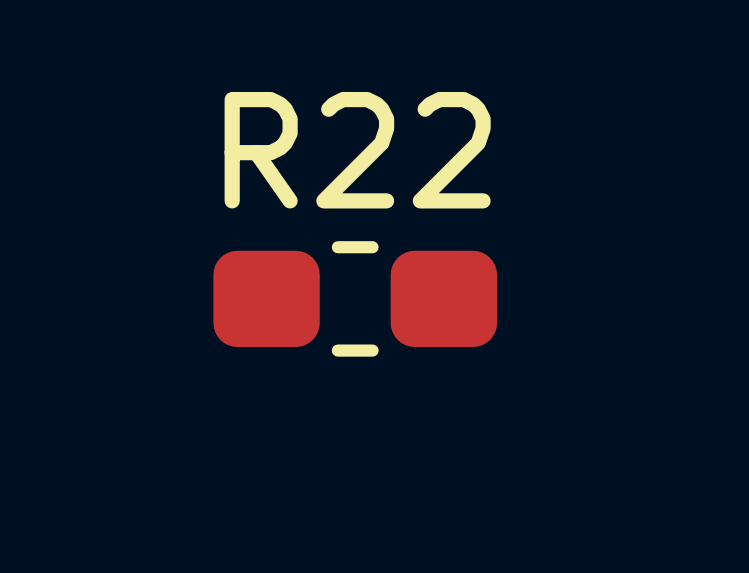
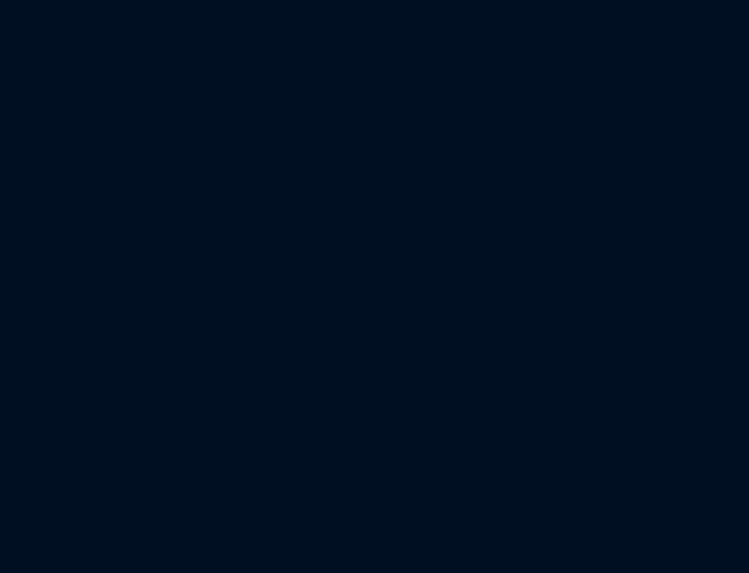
R22: (355, 298) -> none

